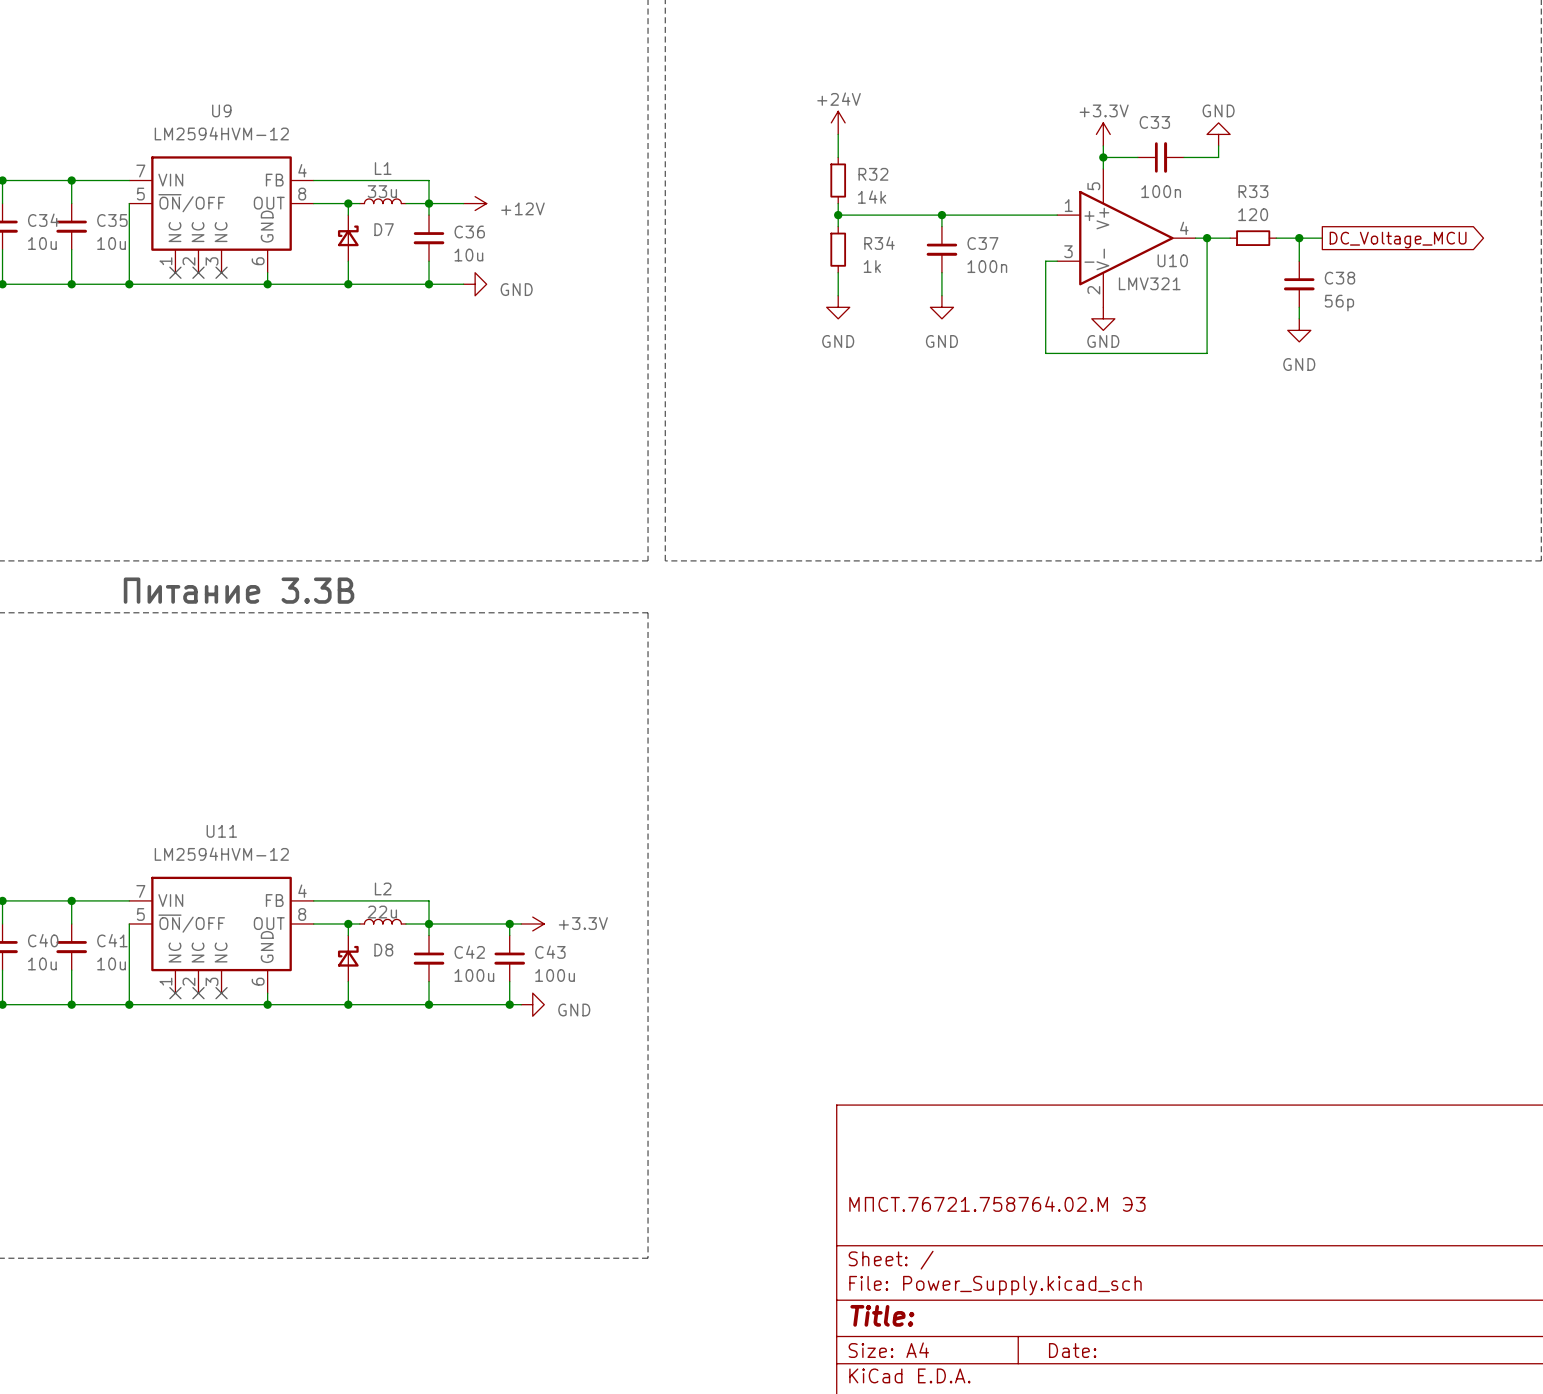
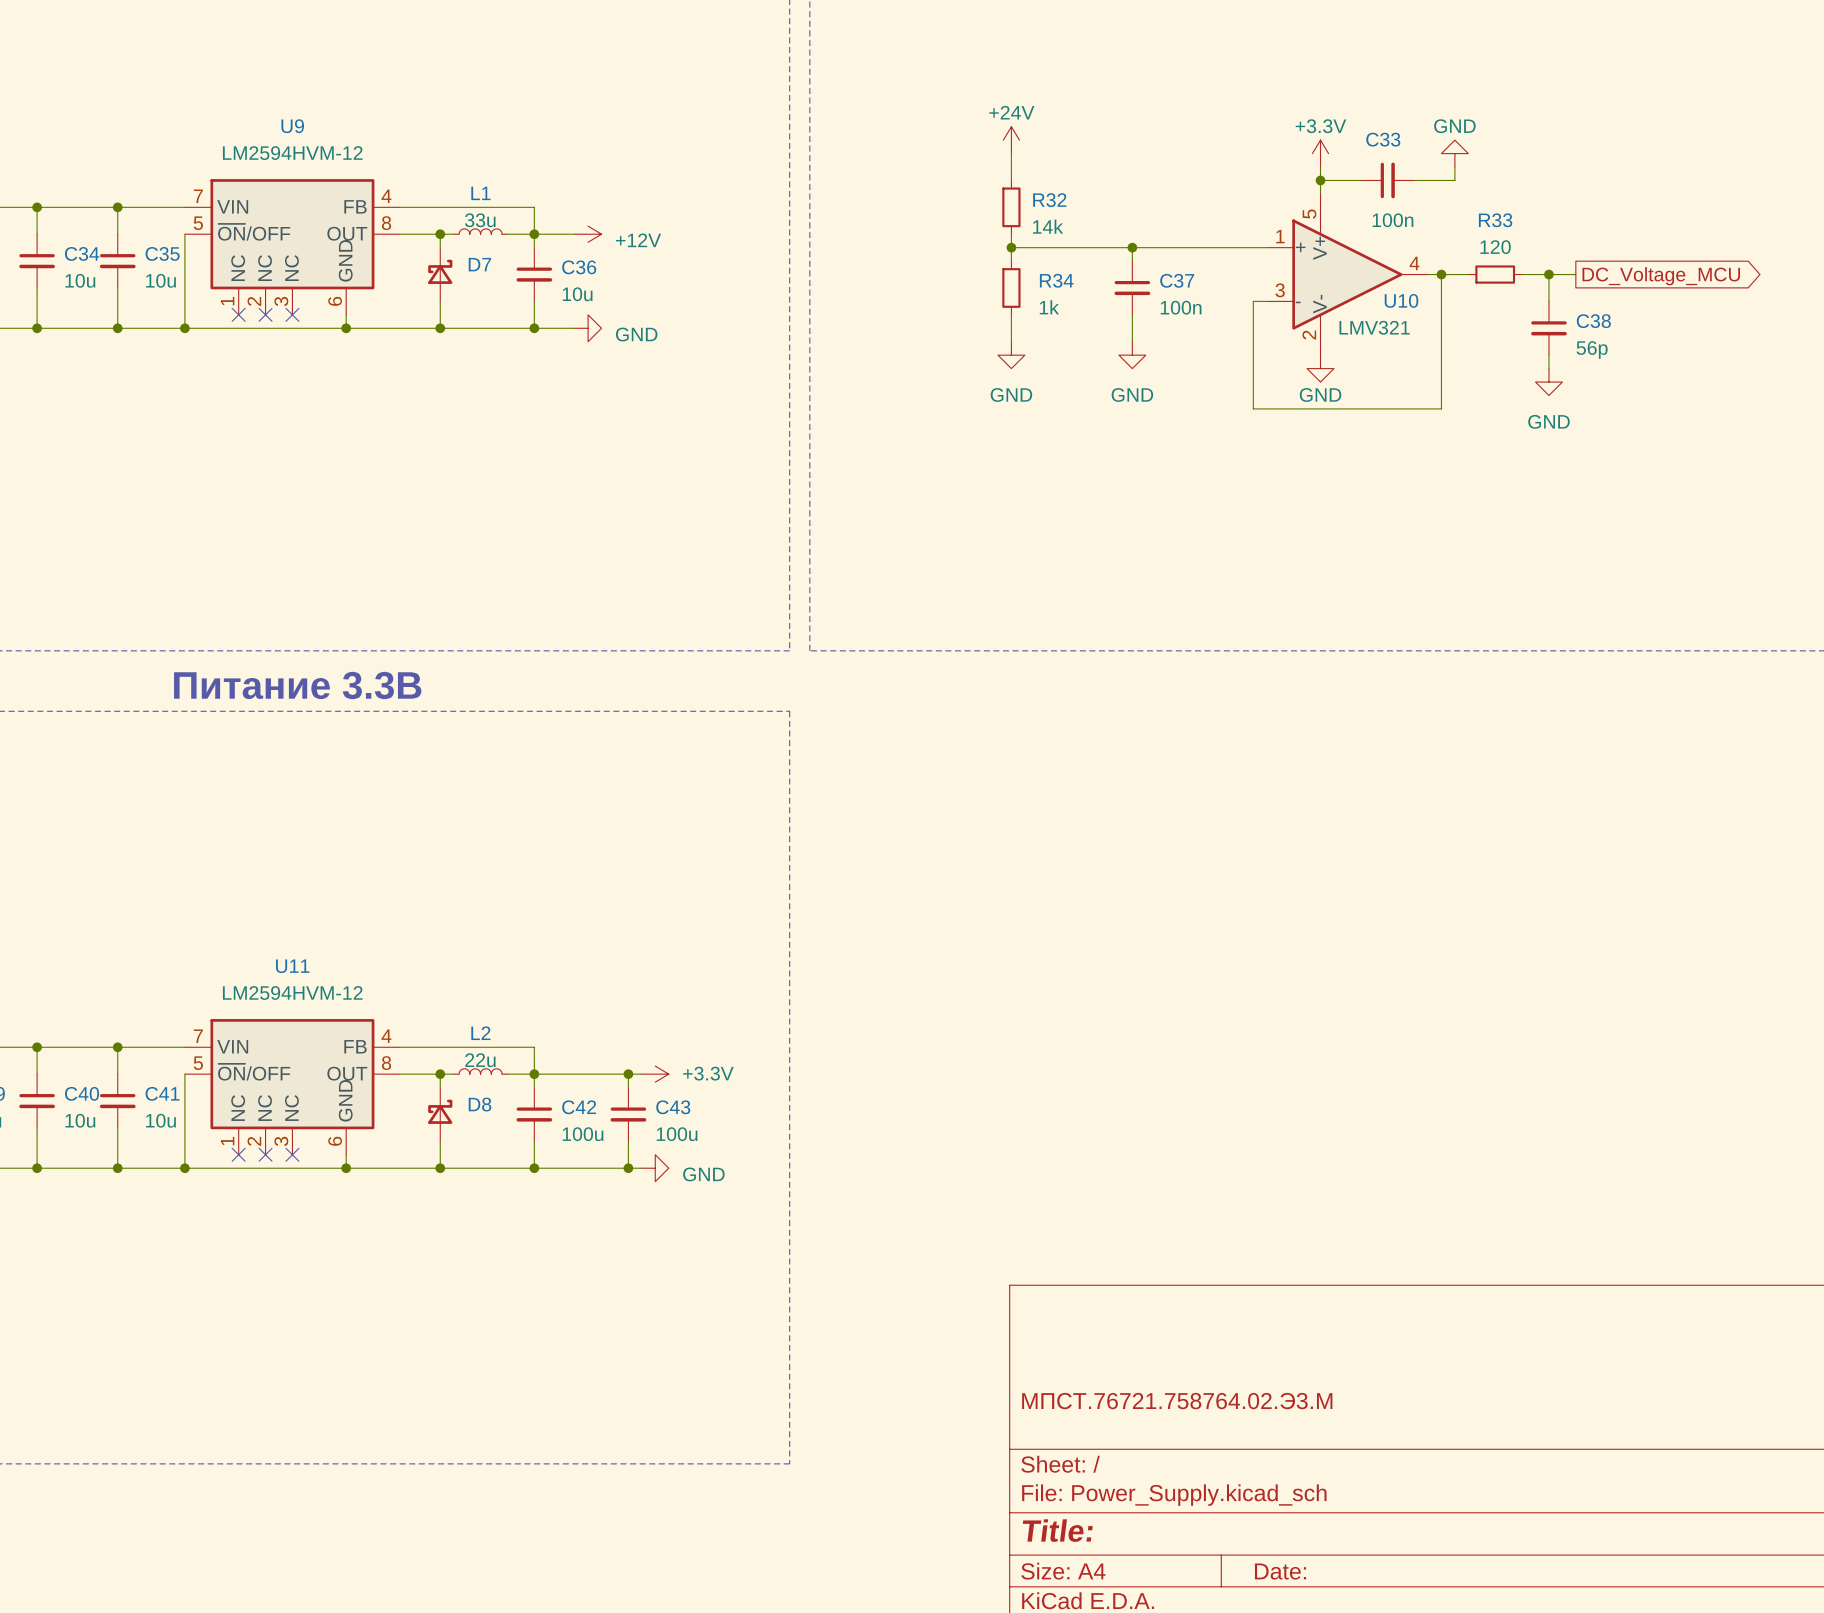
title block: МПСТ.76721.758764.02.М Э3 (997, 1204) -> МПСТ.76721.758764.02.Э3.М (1177, 1401)

